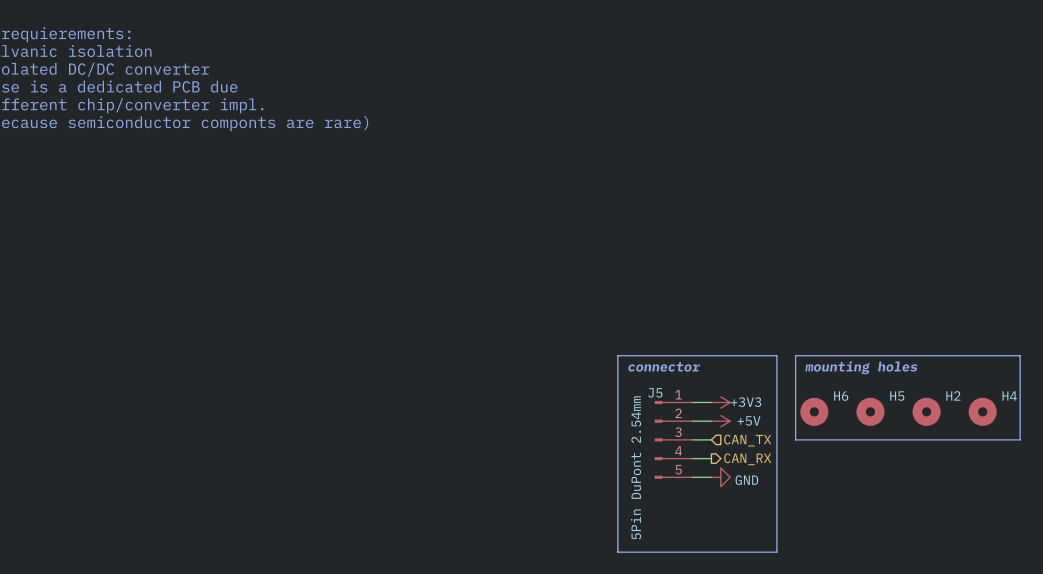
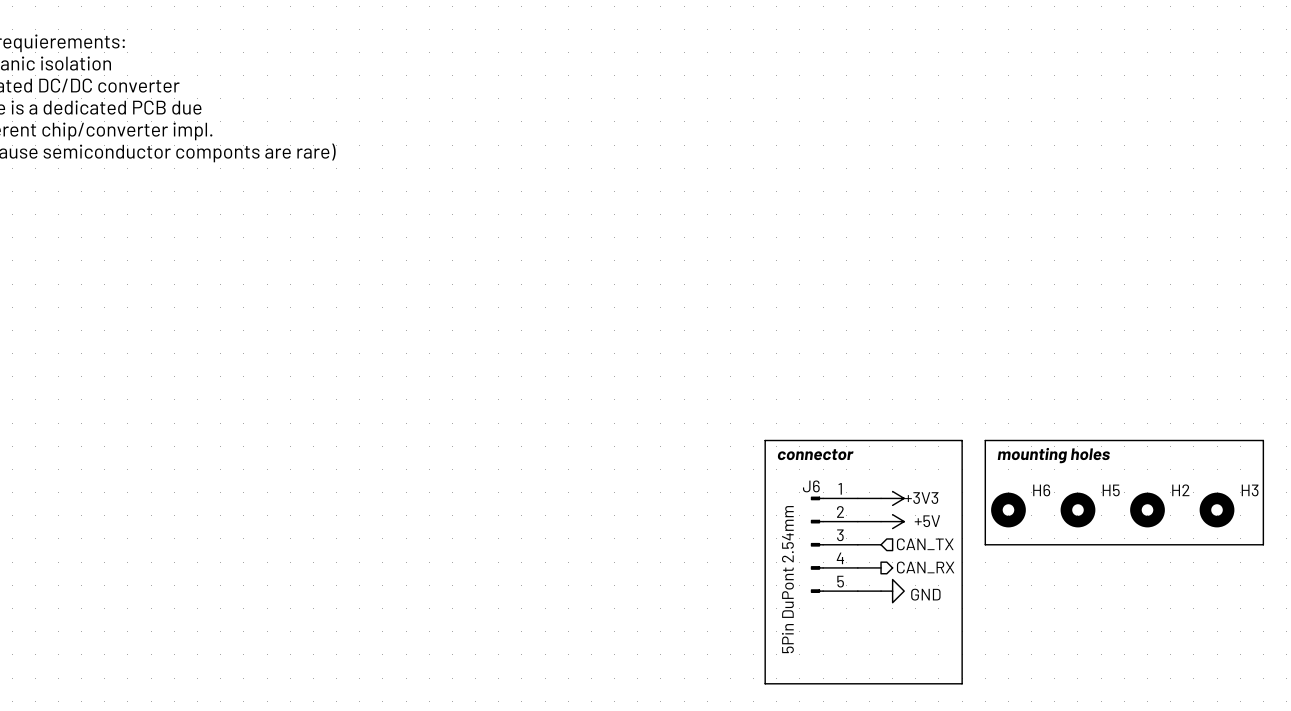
J5 name: J5 (655, 392) -> J6 (811, 486)
H4 name: H4 (1009, 395) -> H3 (1250, 490)

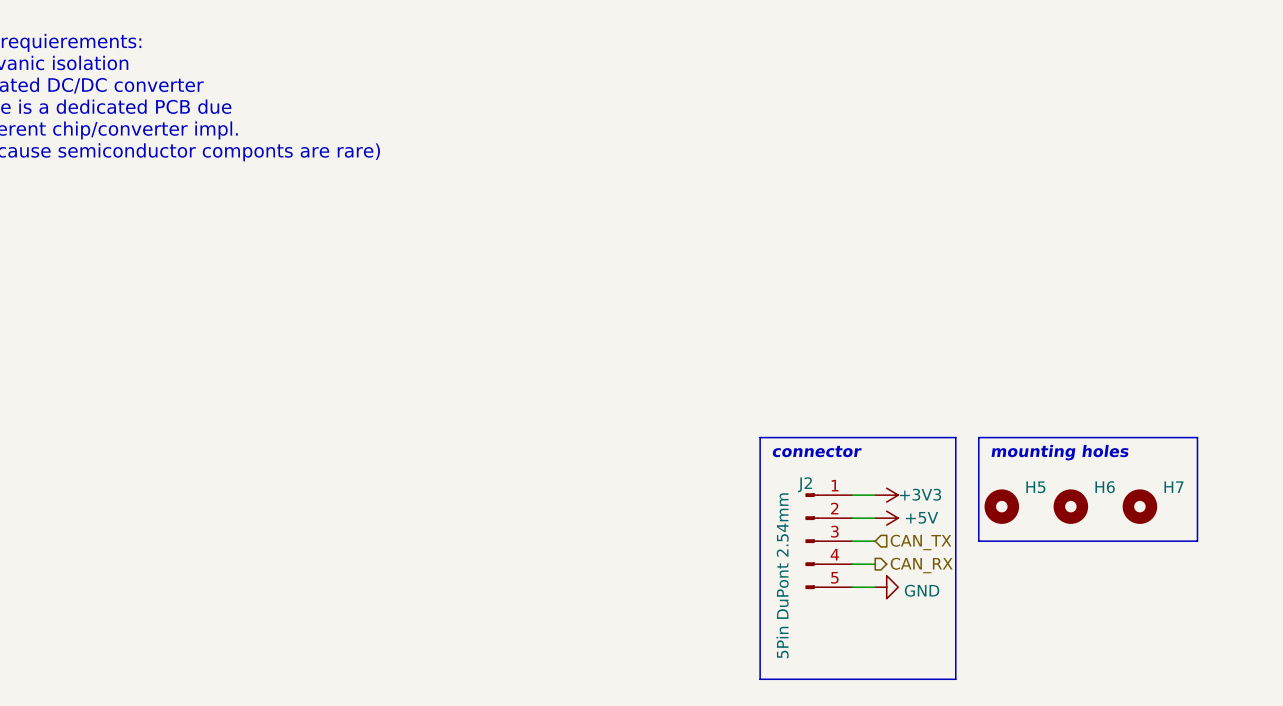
line: (1205, 440) (1263, 440) (1263, 544) (1205, 544) -> (1197, 437) (1197, 541)
J6 name: J6 (811, 486) -> J2 (804, 484)
H6 name: H6 (1041, 490) -> H5 (1035, 487)
H5 name: H5 (1111, 490) -> H6 (1105, 487)
H2 name: H2 (1180, 490) -> H7 (1173, 487)
H3: (1217, 510) -> none

